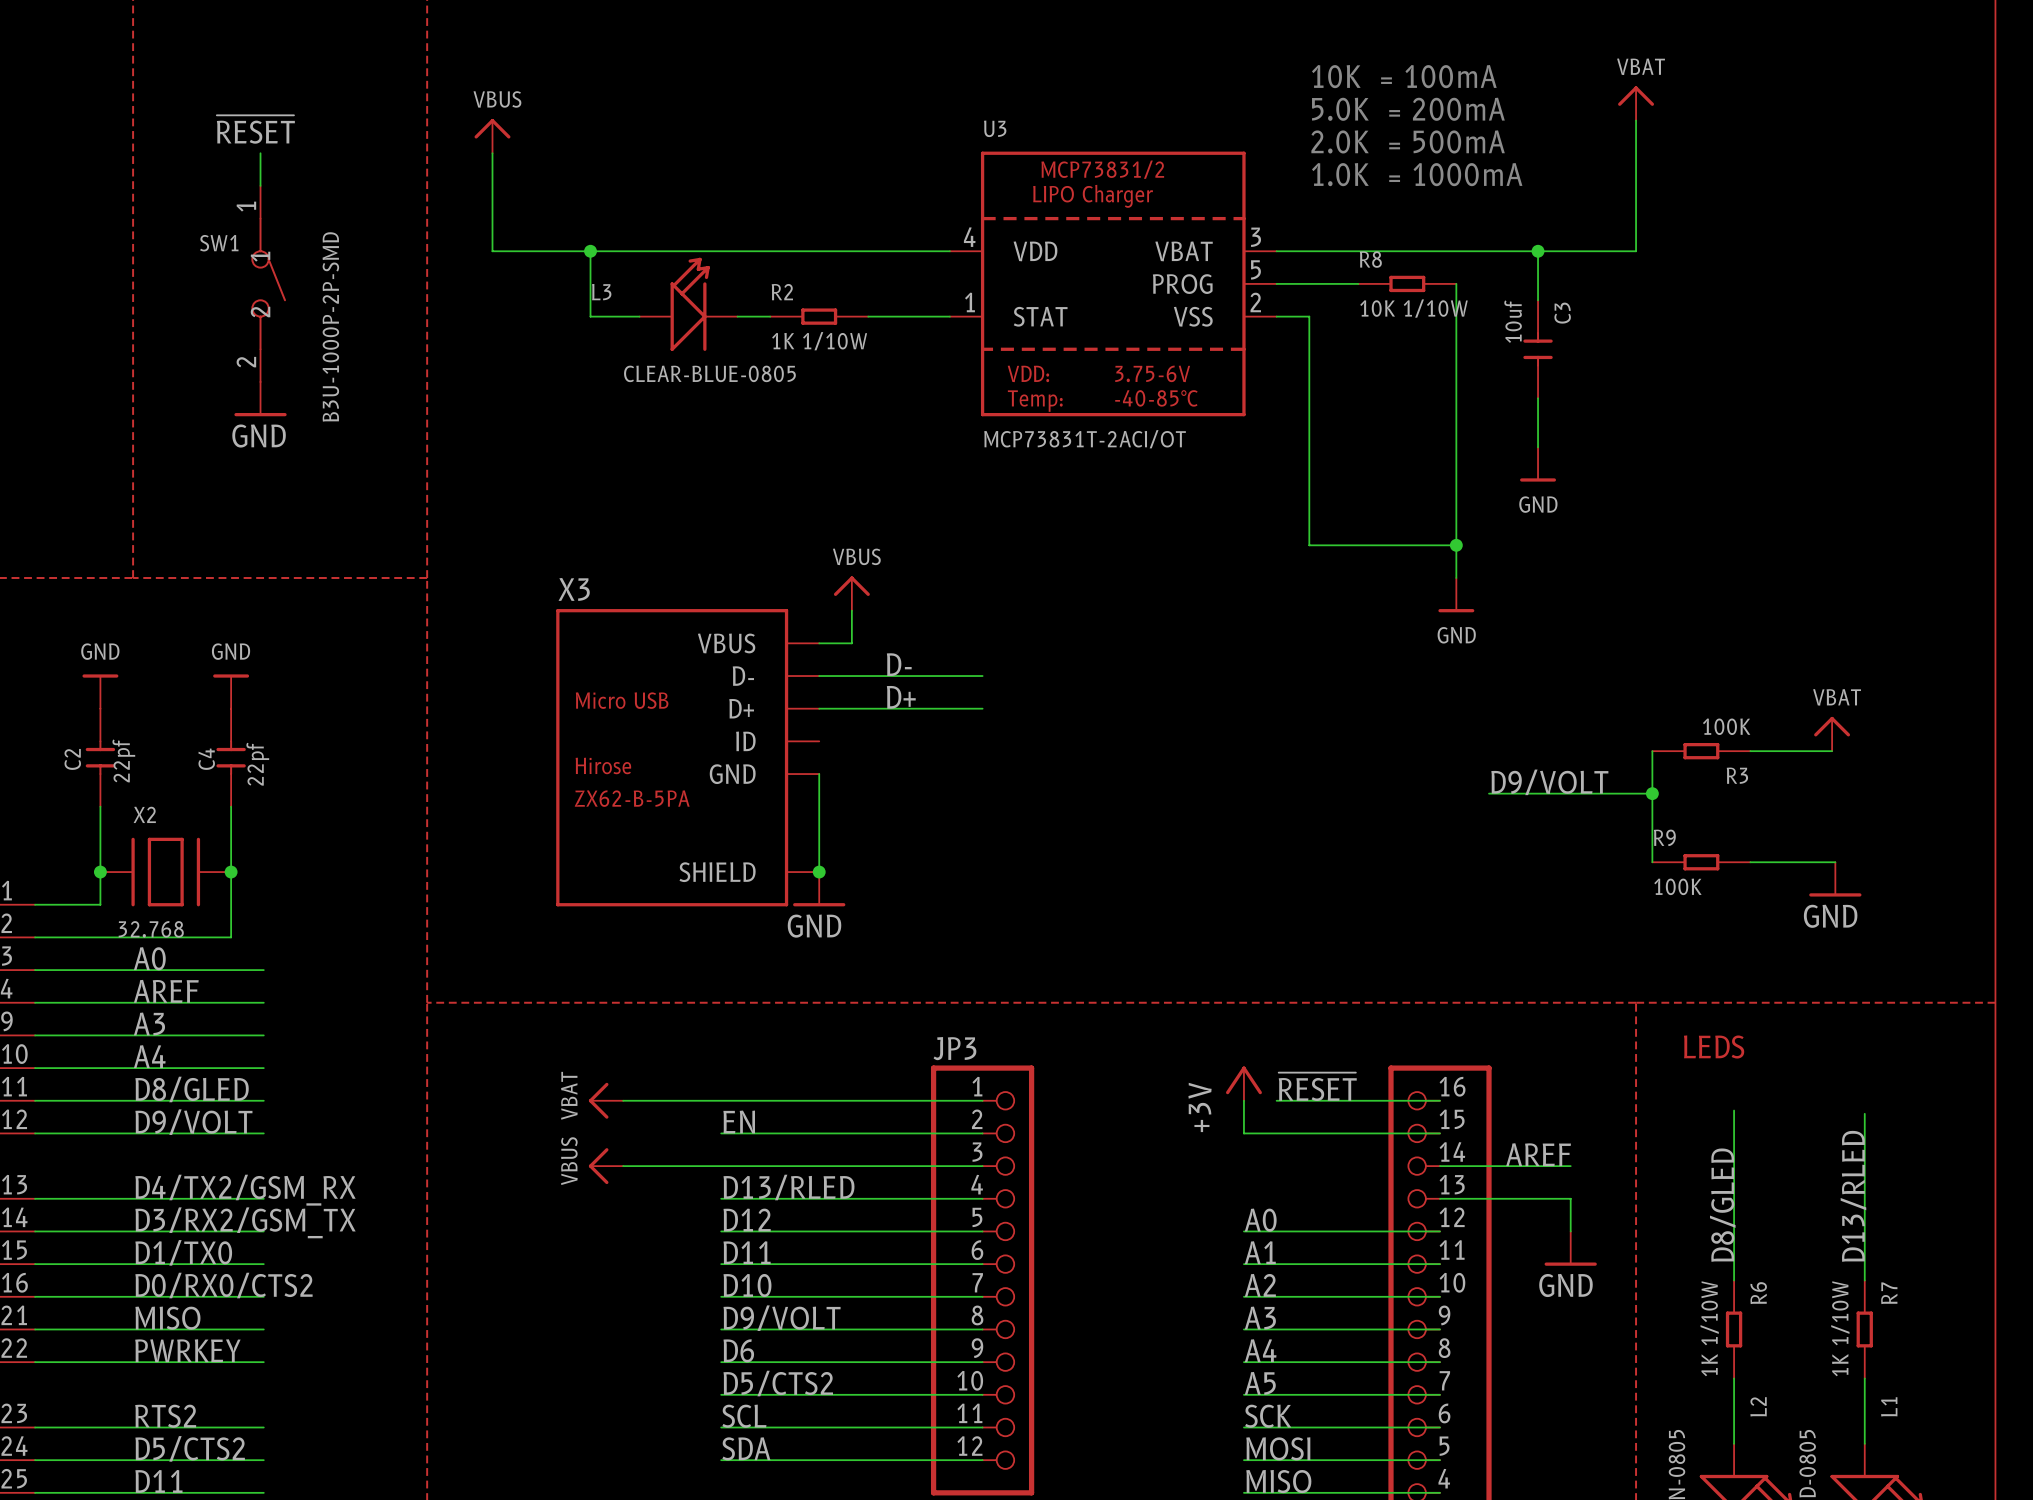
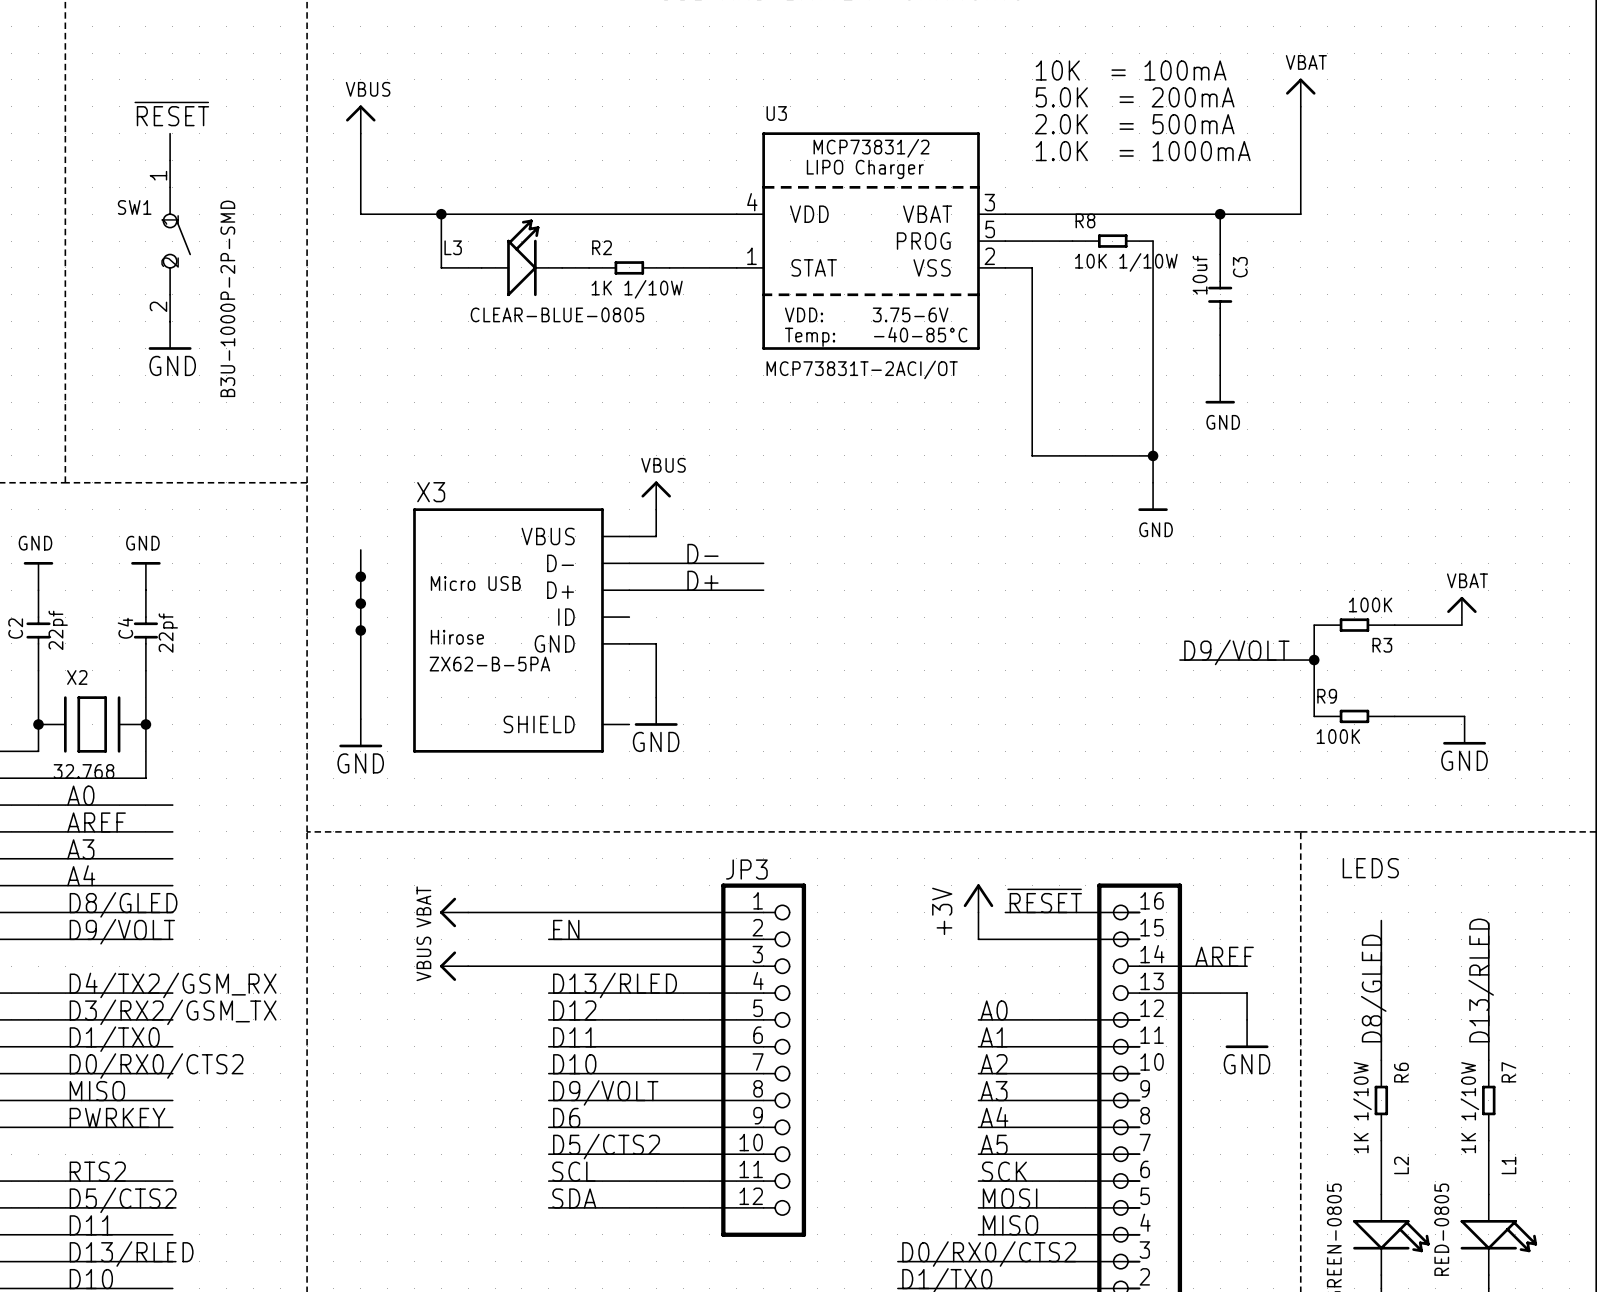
wire: none -> (360, 549) (360, 719)
junction: none -> (360, 576)
junction: none -> (360, 603)
junction: none -> (360, 630)
wire: (819, 774) (819, 872) -> (629, 643) (656, 643) (656, 697)
junction: (819, 872) -> none
power symbol: none -> GND (360, 733)
power symbol position: GND (819, 889) -> GND (656, 711)

